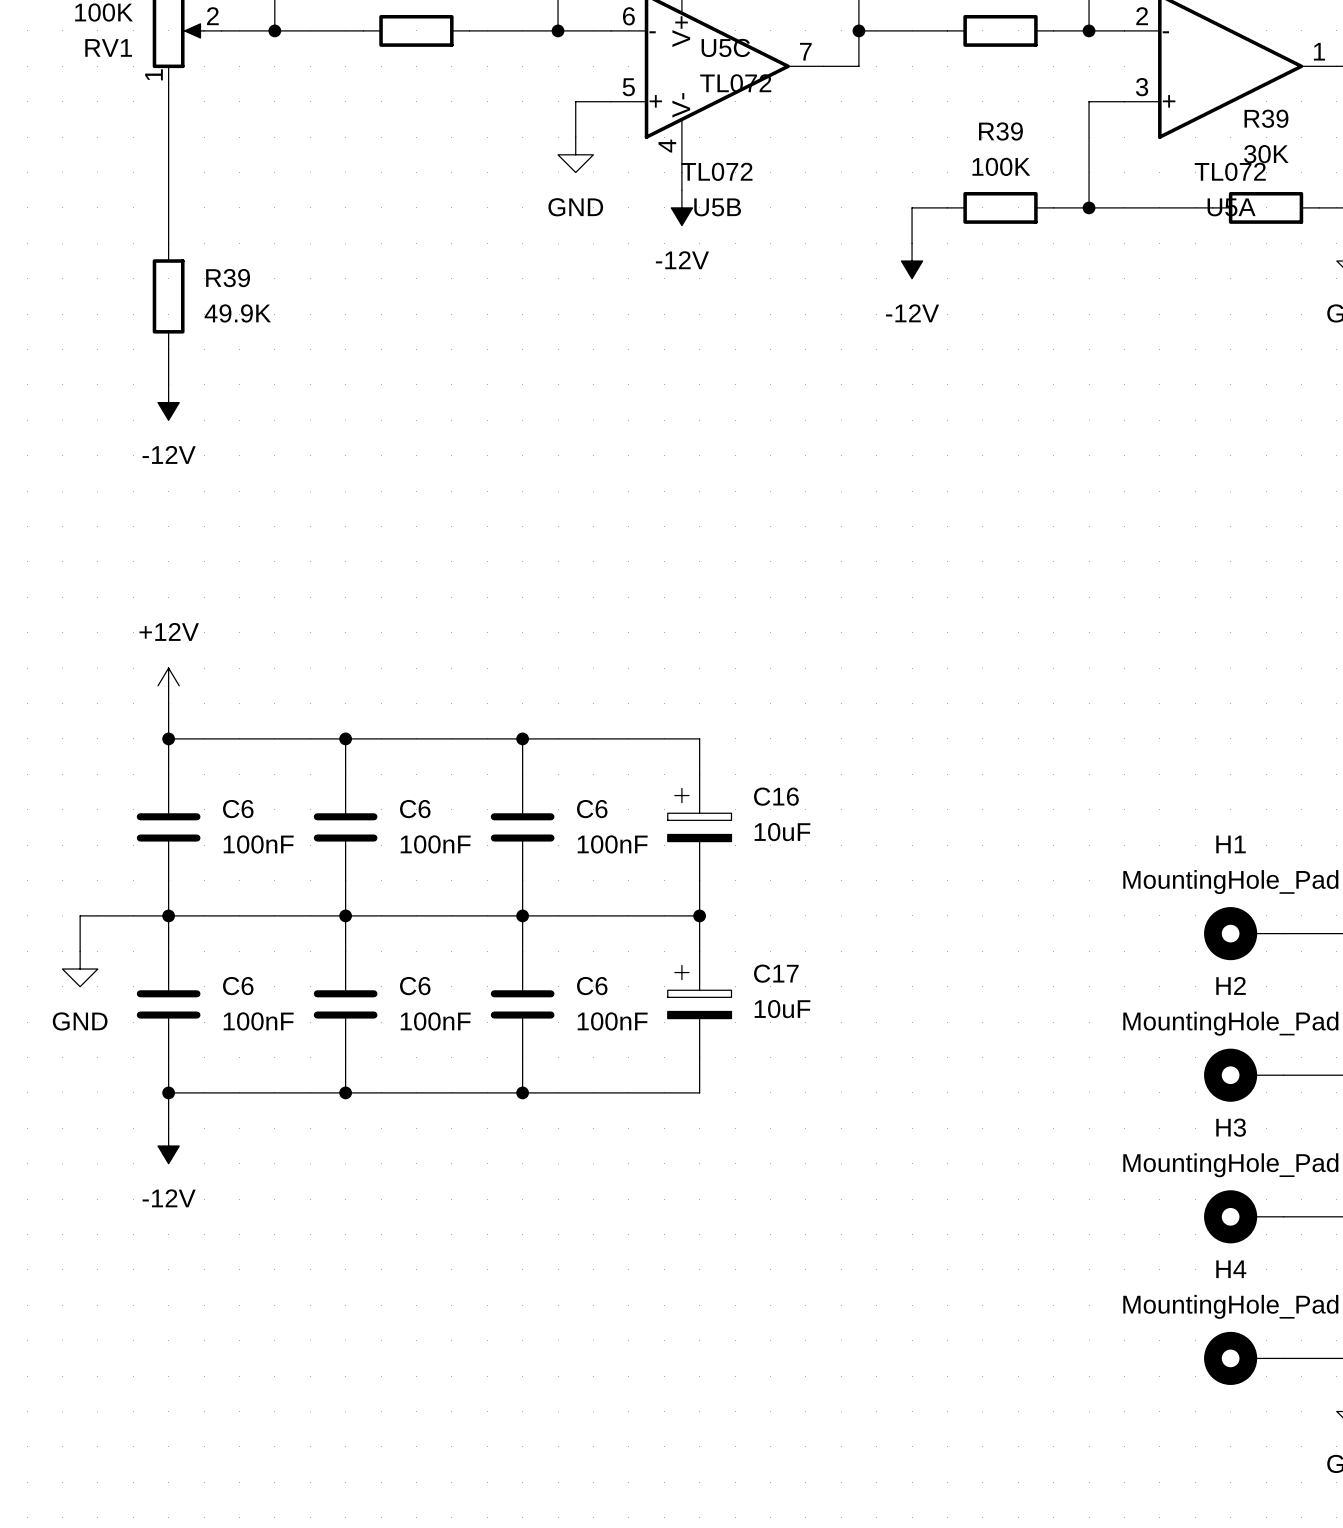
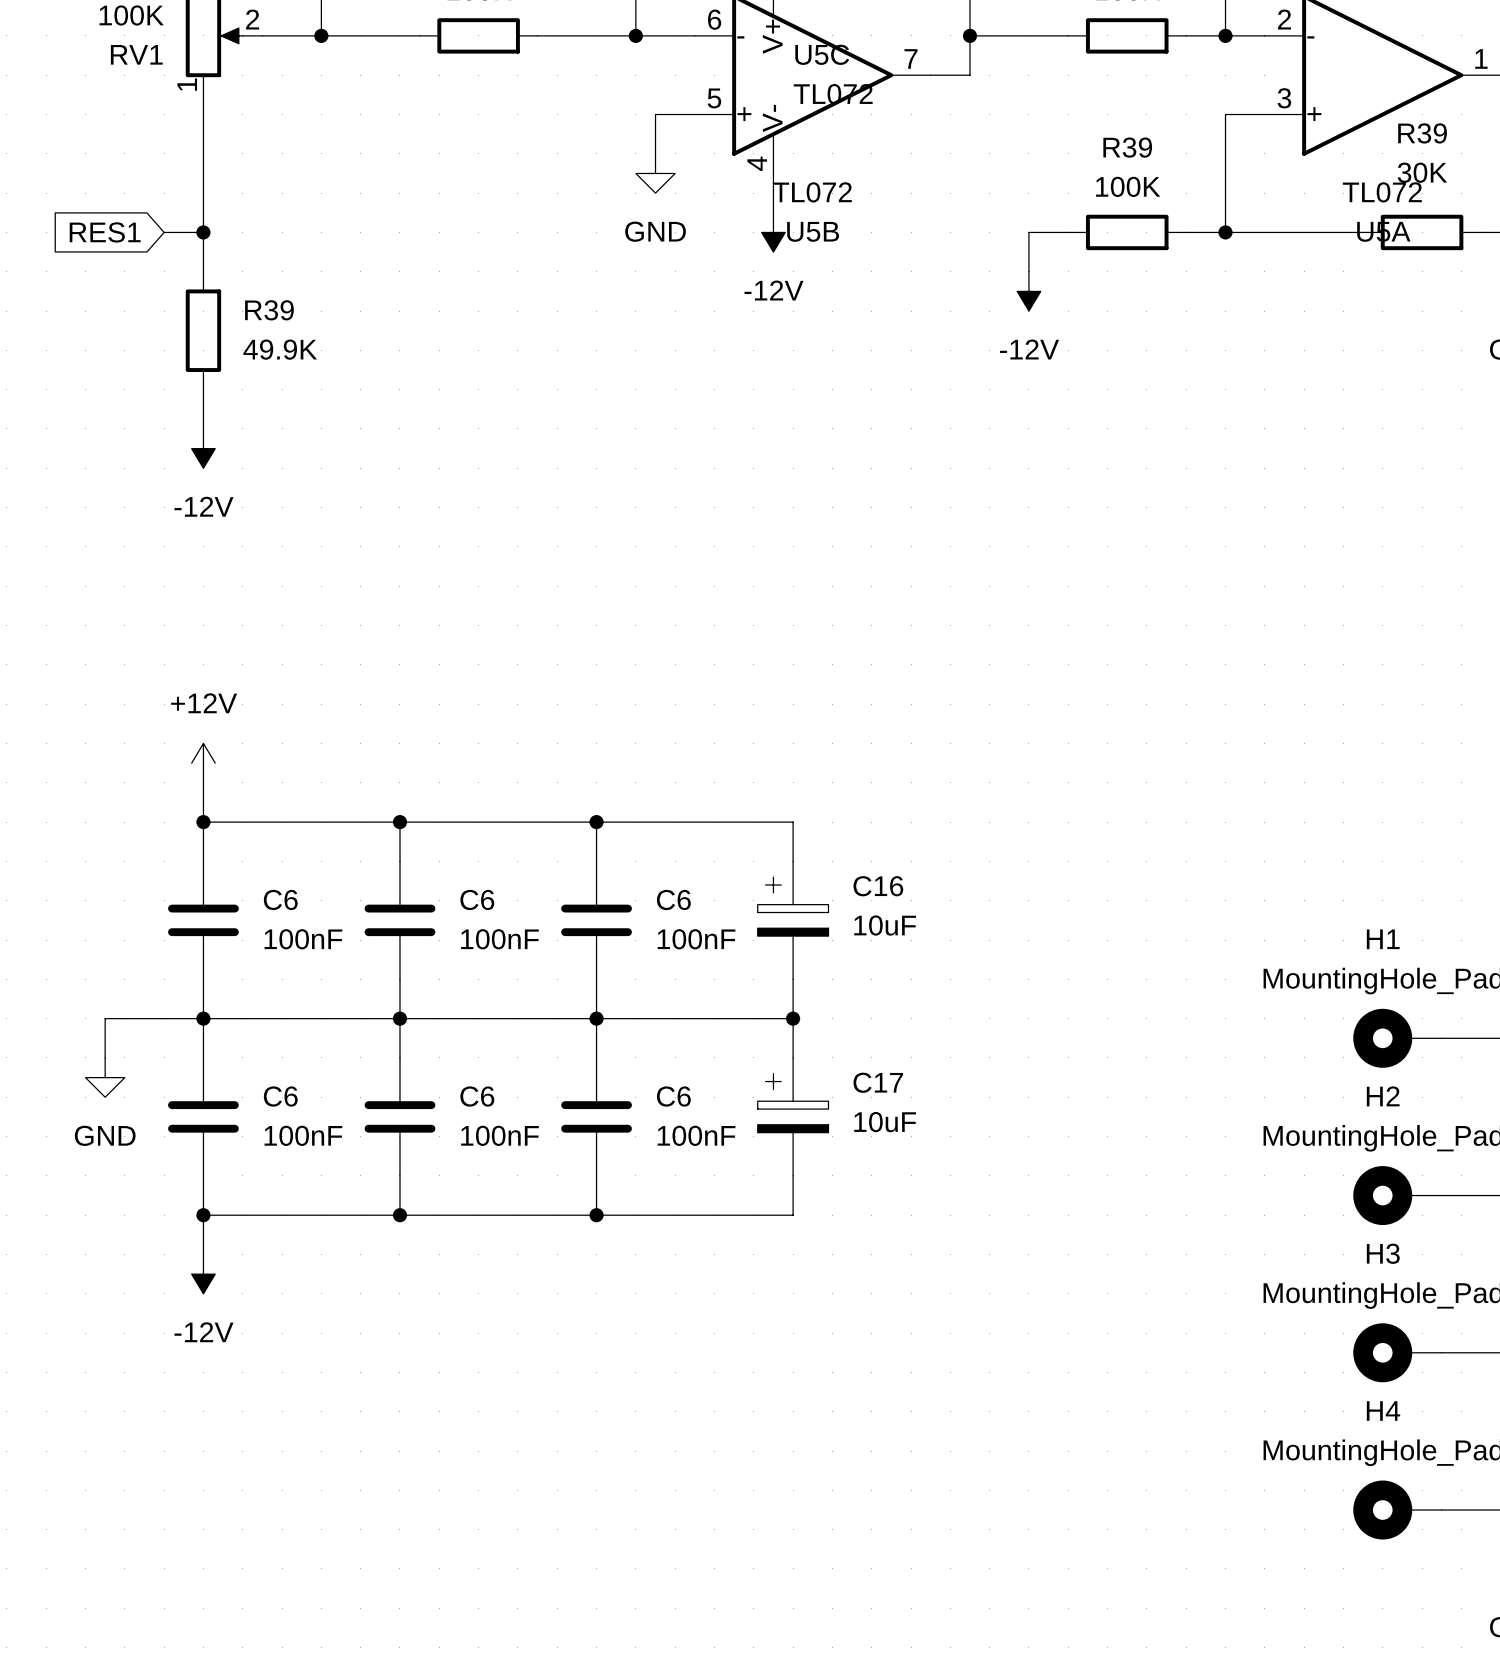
global label: none -> RES1 (105, 232)
wire: none -> (164, 232) (203, 232)
junction: none -> (203, 232)

